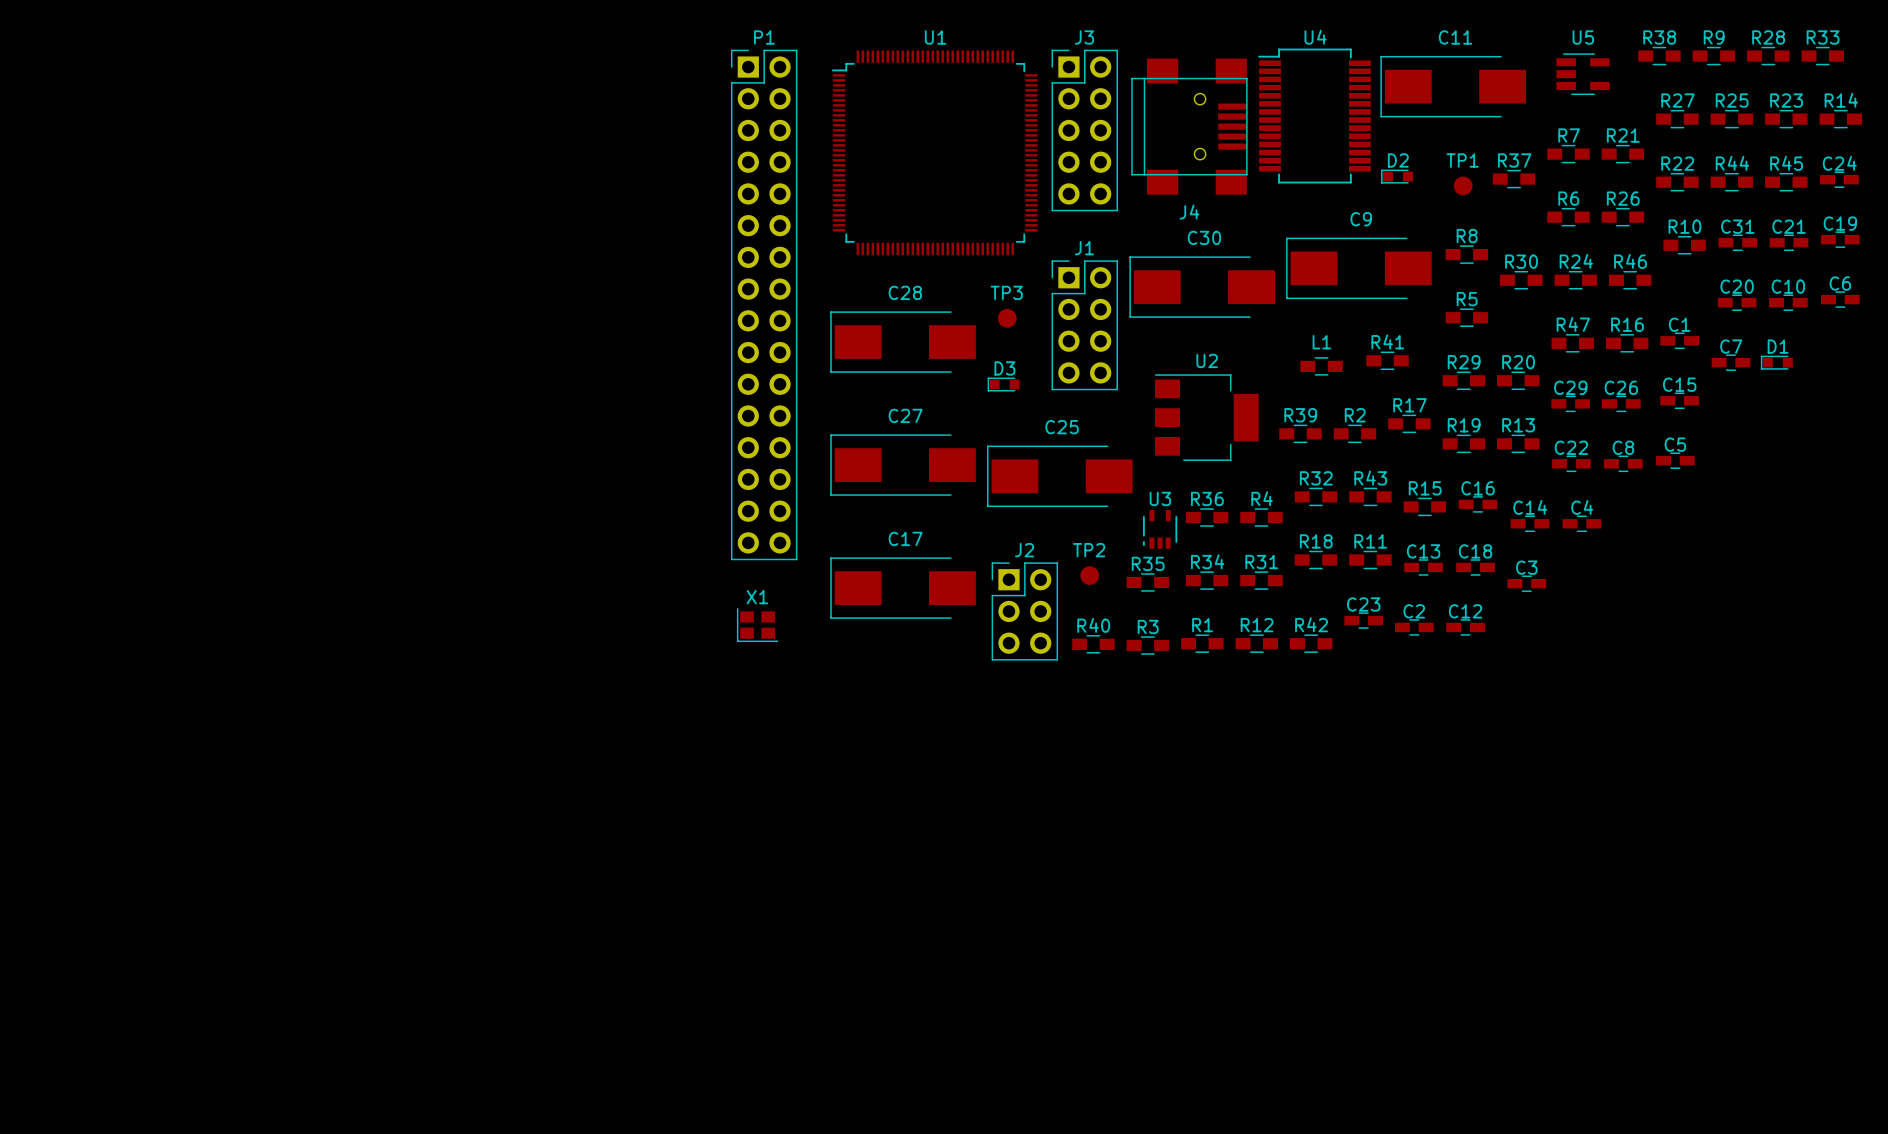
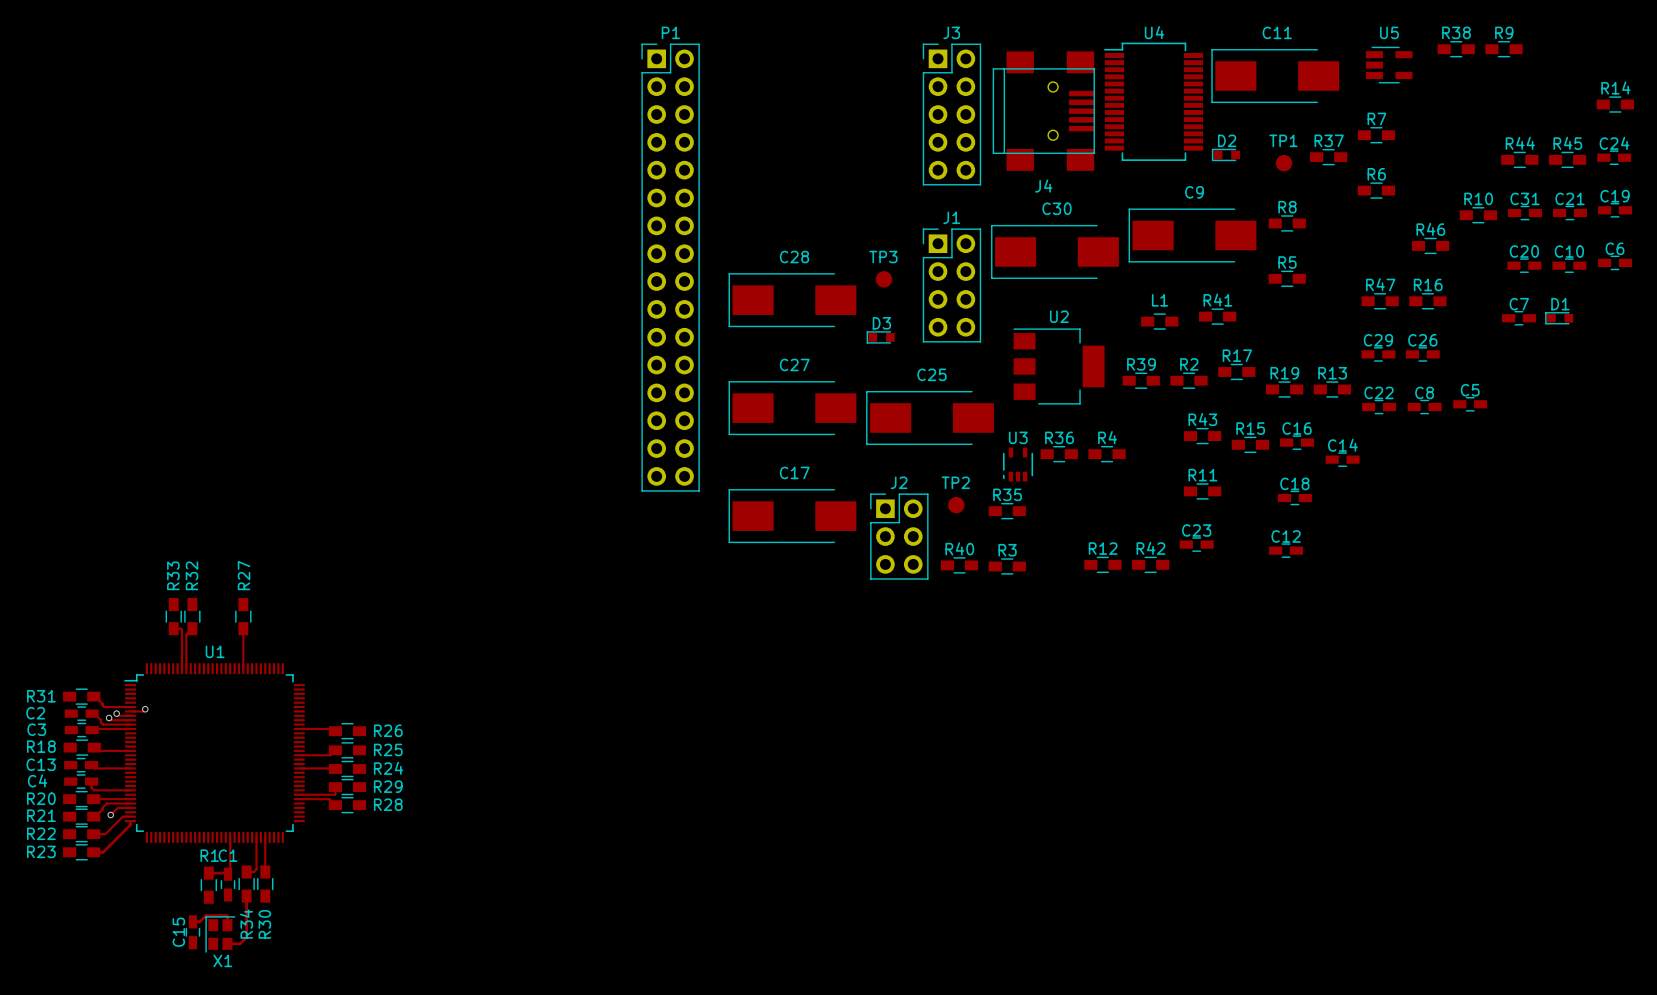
R28 name position: R28 (1768, 37) -> R28 (388, 804)
R33 name position: R33 (1823, 37) -> R33 (173, 575)
R28 position: (1768, 56) -> (347, 805)
R33 rotation: 0° (1822, 56) -> 90° clockwise (173, 616)
R33 position: (1822, 56) -> (173, 616)
R27 name position: R27 (1678, 100) -> R27 (244, 575)
R25 name position: R25 (1732, 100) -> R25 (388, 749)
R23 name position: R23 (1786, 100) -> R23 (41, 851)
R27 rotation: 0° (1677, 119) -> 90° clockwise (243, 616)
R27 position: (1677, 119) -> (243, 616)
R25 position: (1731, 119) -> (347, 750)
R23 position: (1786, 119) -> (81, 852)
R21 name position: R21 (1623, 135) -> R21 (41, 815)
U1 position: (934, 152) -> (214, 753)
R21 position: (1622, 154) -> (81, 816)
R22 name position: R22 (1677, 163) -> R22 (41, 833)
R22 position: (1677, 182) -> (81, 834)
R26 name position: R26 (1623, 198) -> R26 (388, 730)
R26 position: (1622, 217) -> (347, 731)
R30 name position: R30 (1521, 261) -> R30 (264, 924)
R24 name position: R24 (1576, 261) -> R24 (388, 768)
R30 rotation: 0° (1521, 280) -> 90° clockwise (265, 884)
R30 position: (1521, 280) -> (265, 884)
R24 position: (1575, 280) -> (347, 768)
C1 rotation: 0° (1679, 340) -> 90° clockwise (228, 884)
C1 position: (1679, 340) -> (228, 884)
R29 name position: R29 (1464, 362) -> R29 (388, 786)
R20 name position: R20 (1518, 362) -> R20 (41, 798)
R29 position: (1463, 380) -> (347, 787)
R20 position: (1518, 380) -> (81, 799)
C15 rotation: 0° (1679, 400) -> 90° clockwise (192, 932)
C15 position: (1679, 400) -> (192, 932)
R32 name position: R32 (1316, 478) -> R32 (191, 575)
R32 rotation: 0° (1315, 496) -> 90° clockwise (192, 616)
R32 position: (1315, 496) -> (192, 616)
C4 name position: C4 (1582, 507) -> C4 (37, 780)
C4 position: (1581, 523) -> (81, 781)
R18 name position: R18 (1316, 541) -> R18 (41, 746)
C13 name position: C13 (1423, 551) -> C13 (41, 764)
R18 position: (1315, 559) -> (82, 747)
R34 name position: R34 (1207, 561) -> R34 (246, 924)
R31 name position: R31 (1261, 562) -> R31 (41, 696)
C13 position: (1423, 567) -> (81, 765)
C3 name position: C3 (1526, 567) -> C3 (36, 729)
R34 rotation: 0° (1207, 580) -> 90° clockwise (246, 884)
R34 position: (1207, 580) -> (246, 884)
R31 position: (1261, 580) -> (81, 696)
C3 position: (1526, 583) -> (81, 730)
X1 name position: X1 (757, 597) -> X1 (222, 960)
C2 name position: C2 (1414, 611) -> C2 (35, 713)
X1 rotation: 0° (757, 625) -> 90° clockwise (220, 934)
X1 position: (757, 625) -> (220, 934)
C2 position: (1414, 627) -> (81, 713)
R1 rotation: 0° (1202, 643) -> 90° clockwise (208, 885)
R1 position: (1202, 643) -> (208, 885)
track: none -> (173, 628) (181, 629) (181, 668)
track: none -> (192, 628) (186, 634) (186, 668)
track: none -> (243, 628) (243, 668)
track: none -> (93, 696) (104, 707) (130, 707)
track: none -> (145, 709) (143, 711) (130, 711)
via: none -> (145, 709)
track: none -> (92, 713) (94, 713) (103, 724) (130, 724)
track: none -> (116, 713) (118, 715) (130, 715)
via: none -> (116, 713)
track: none -> (109, 718) (111, 720) (130, 720)
via: none -> (109, 718)
track: none -> (130, 728) (92, 730)
track: none -> (299, 728) (333, 728) (335, 731)
track: none -> (94, 747) (97, 750) (130, 750)
track: none -> (335, 750) (330, 755) (299, 755)
track: none -> (91, 765) (94, 768) (130, 768)
track: none -> (299, 768) (335, 768)
track: none -> (91, 781) (91, 787) (94, 790) (130, 790)
track: none -> (335, 787) (334, 794) (299, 794)
track: none -> (93, 799) (130, 799)
track: none -> (299, 799) (329, 799) (335, 805)
track: none -> (130, 803) (106, 803) (93, 816)
track: none -> (130, 807) (117, 807) (110, 815)
via: none -> (110, 815)
track: none -> (130, 816) (122, 816) (105, 834) (93, 834)
track: none -> (130, 821) (130, 824) (103, 852) (93, 852)
track: none -> (230, 837) (230, 872) (228, 874) (208, 873)
track: none -> (256, 837) (256, 869) (253, 872) (246, 872)
track: none -> (265, 837) (265, 872)
track: none -> (246, 896) (246, 937) (240, 943) (227, 943)
track: none -> (192, 919) (192, 921) (199, 921) (206, 915) (226, 915) (227, 925)

